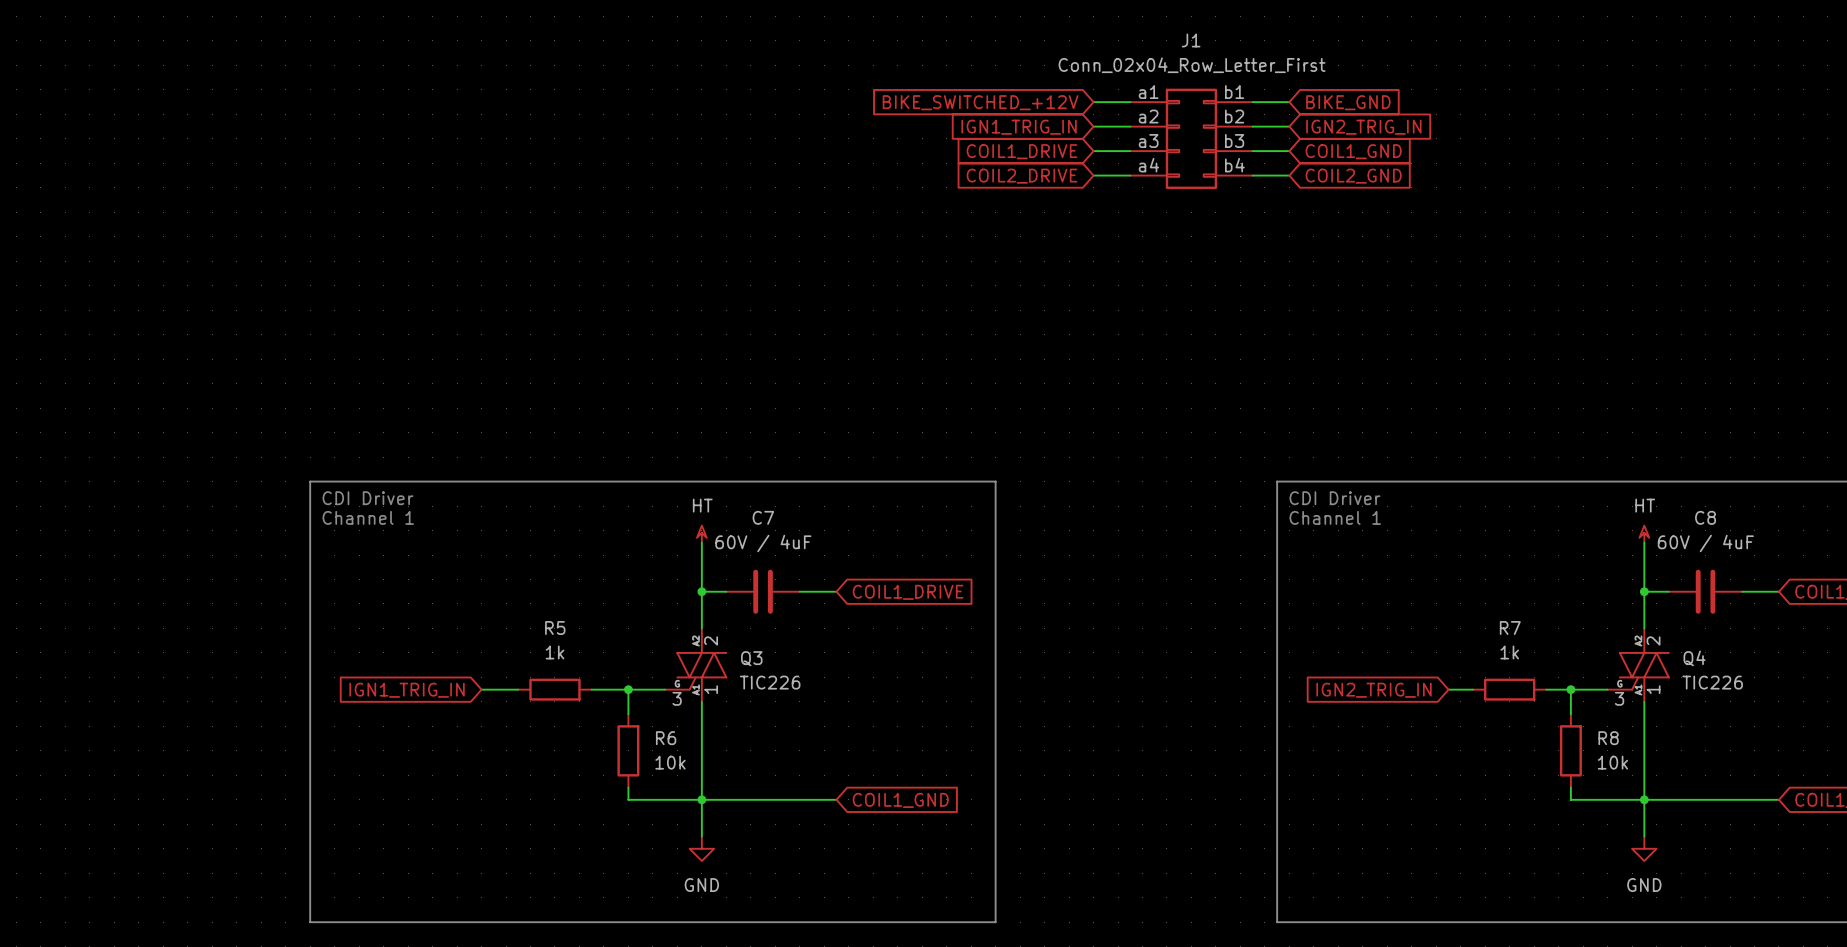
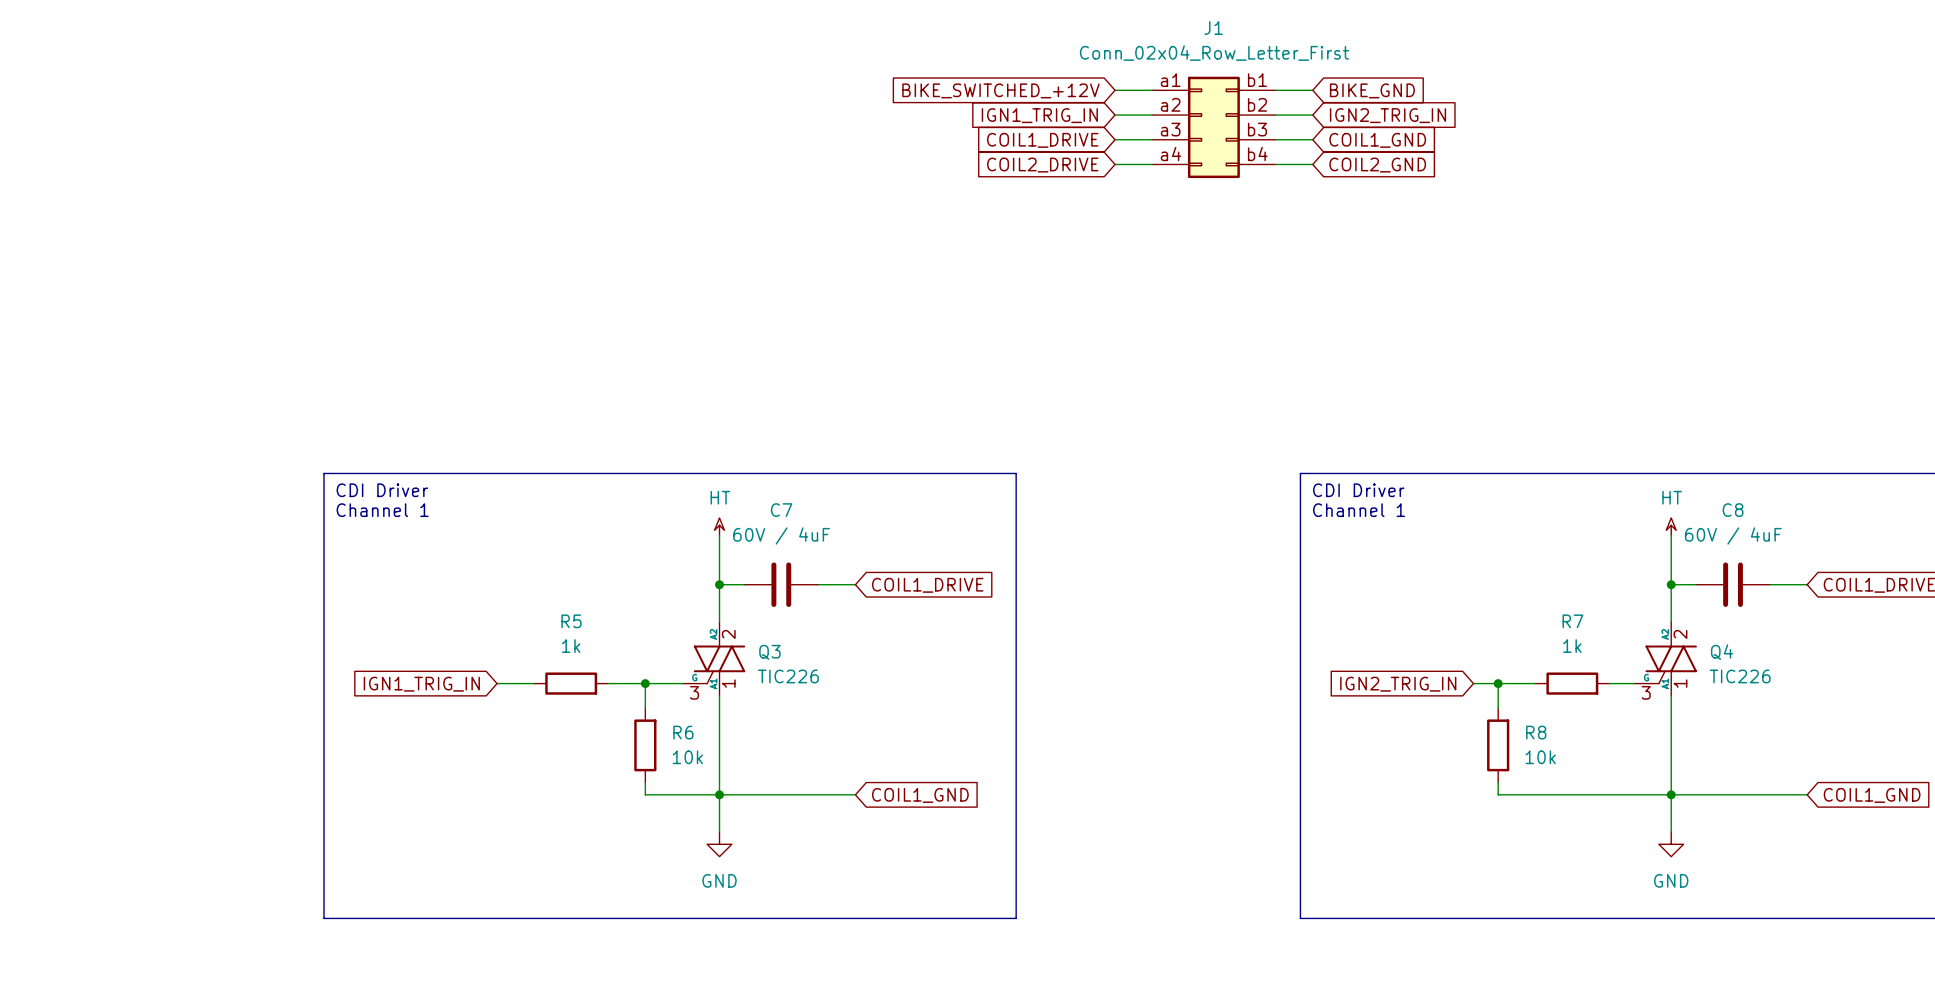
junction: none -> (1498, 683)
wire: none -> (1535, 683) (1498, 683) (1498, 708)
R7 position: (1509, 689) -> (1572, 683)
wire: (1546, 689) (1583, 689) -> none
wire: (1570, 689) (1570, 714) -> none
junction: (1570, 689) -> none
R8 position: (1570, 750) -> (1498, 745)
wire: (1570, 787) (1570, 799) -> (1498, 782) (1498, 794) (1597, 794)

